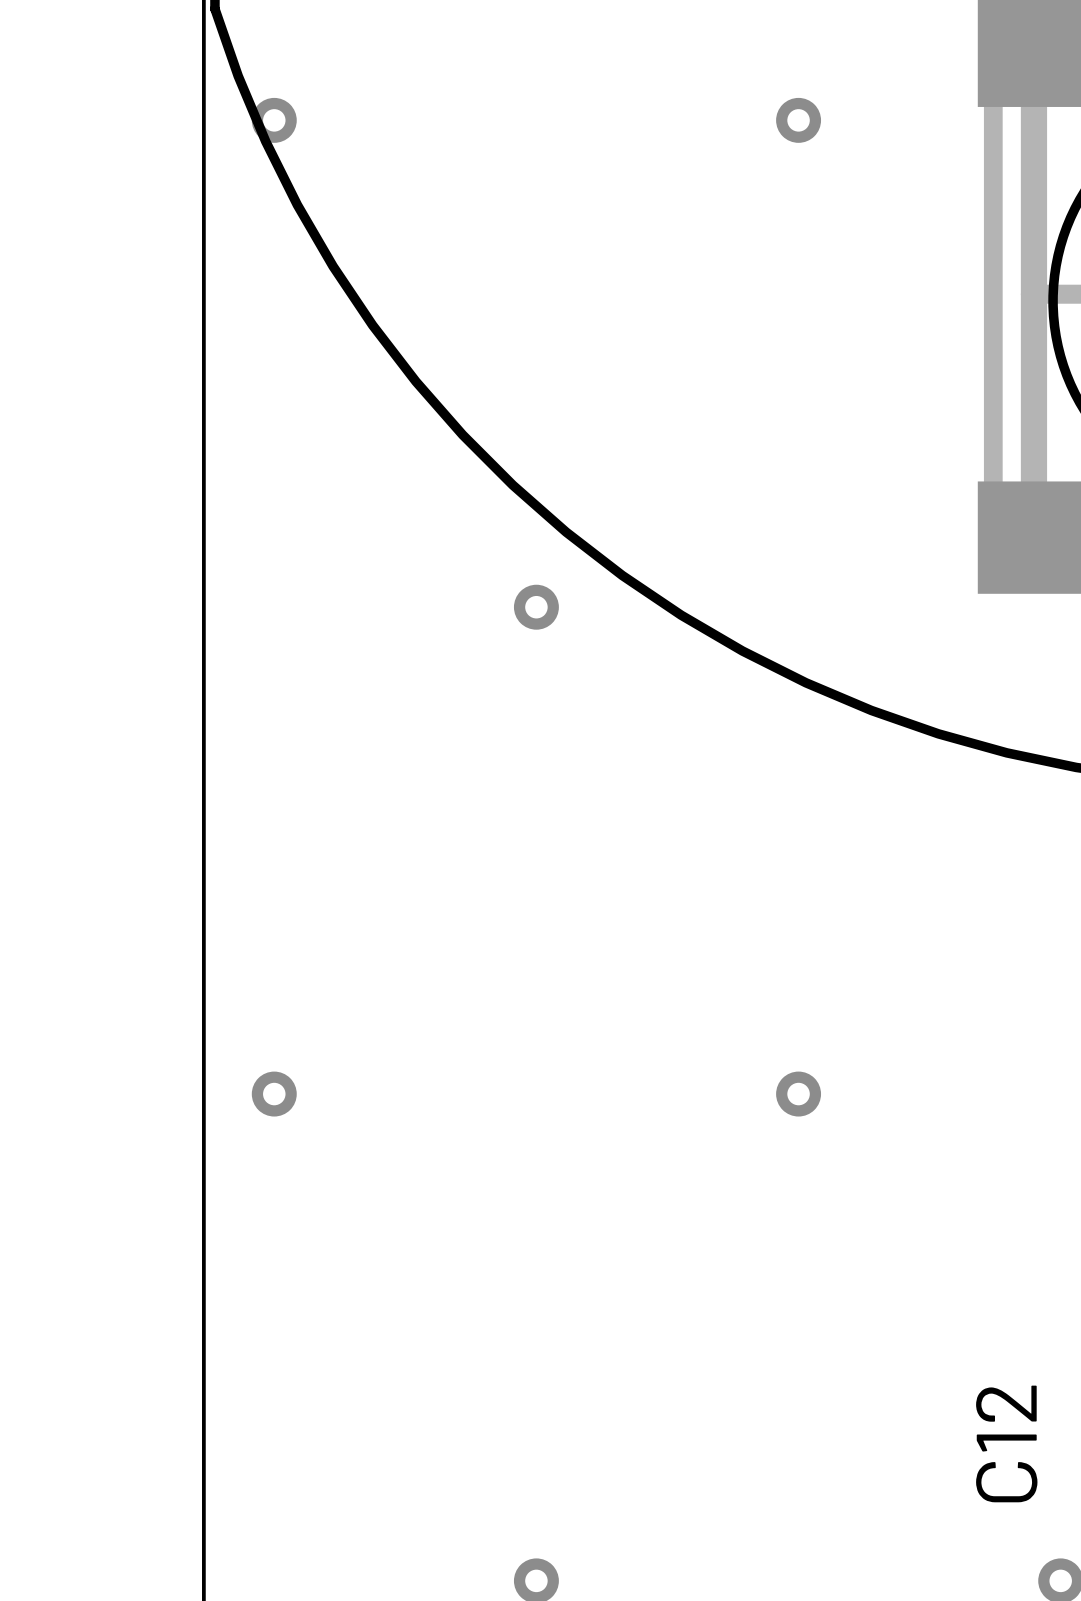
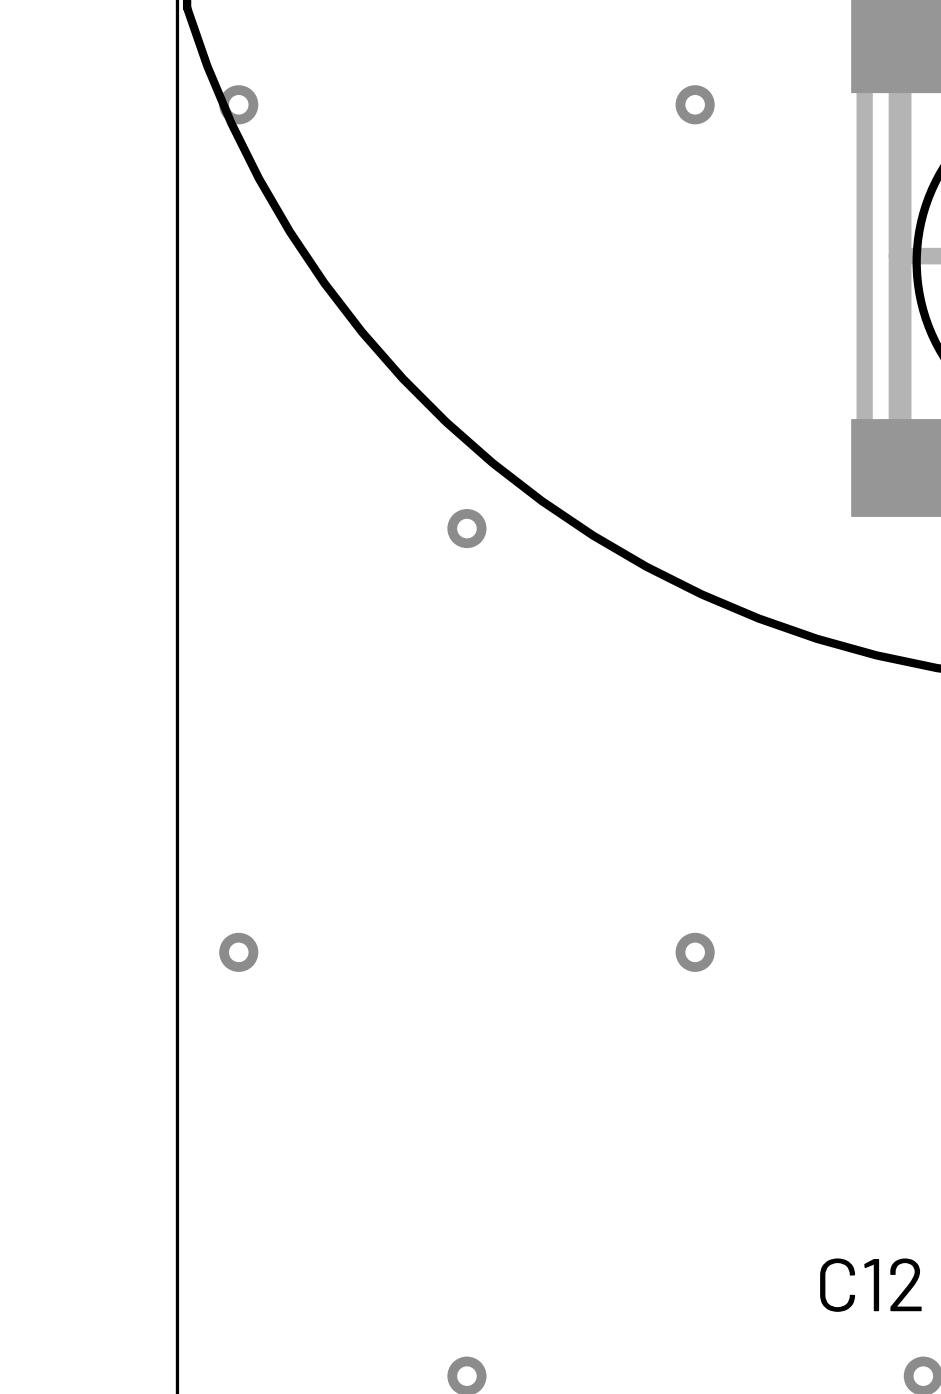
C12 name rotation: 0° (1006, 1443) -> 90° clockwise (870, 1285)

